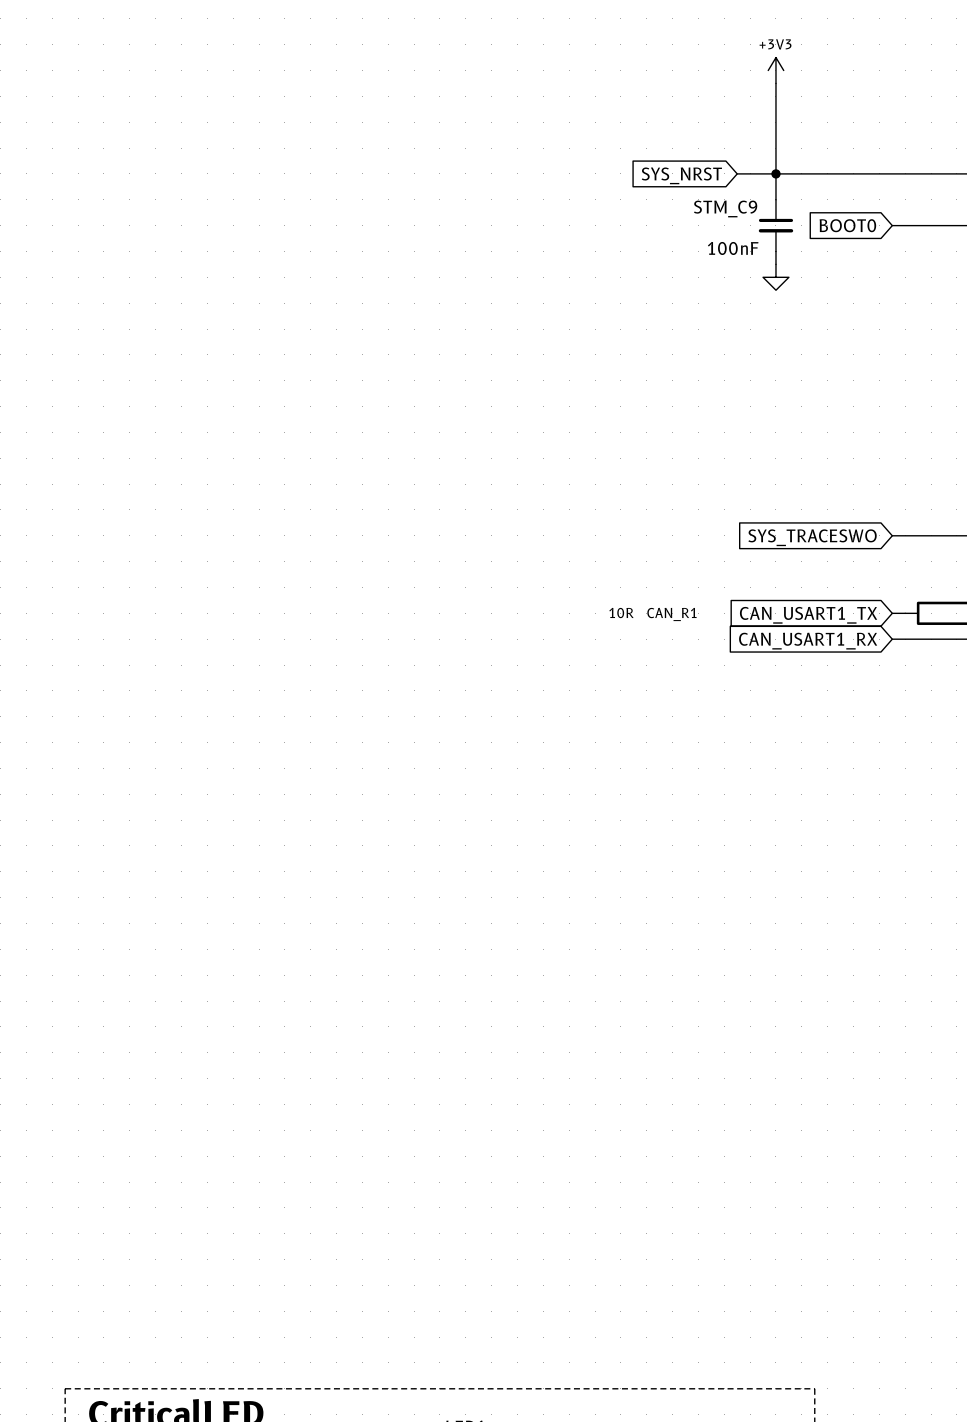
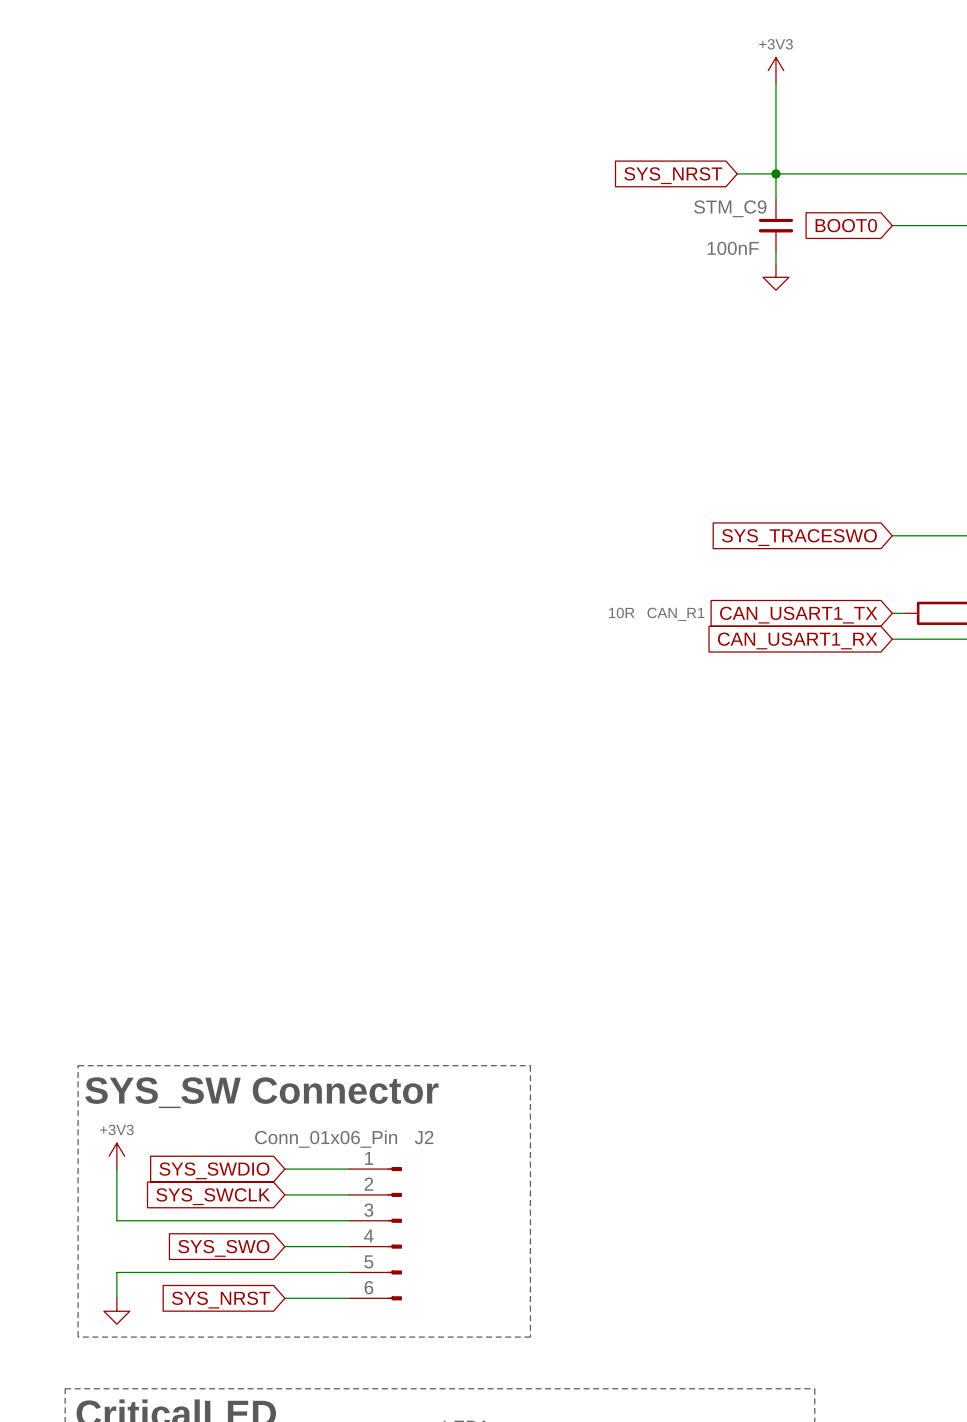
line: none -> (78, 1065) (530, 1065) (530, 1337) (78, 1337) (78, 1065)
text: none -> SYS_SW Connector (261, 1092)
power symbol: none -> +3V3 (116, 1156)
wire: none -> (116, 1169) (116, 1220) (349, 1220)
wire: none -> (284, 1169) (349, 1169)
global label: none -> SYS_SWDIO (214, 1170)
wire: none -> (284, 1194) (349, 1194)
global label: none -> SYS_SWCLK (213, 1196)
J2: none -> Conn_01x06_Pin (375, 1233)
wire: none -> (284, 1246) (349, 1246)
global label: none -> SYS_SWO (223, 1248)
wire: none -> (349, 1272) (116, 1272) (116, 1298)
wire: none -> (284, 1298) (349, 1298)
global label: none -> SYS_NRST (220, 1300)
power symbol: none -> (116, 1311)

